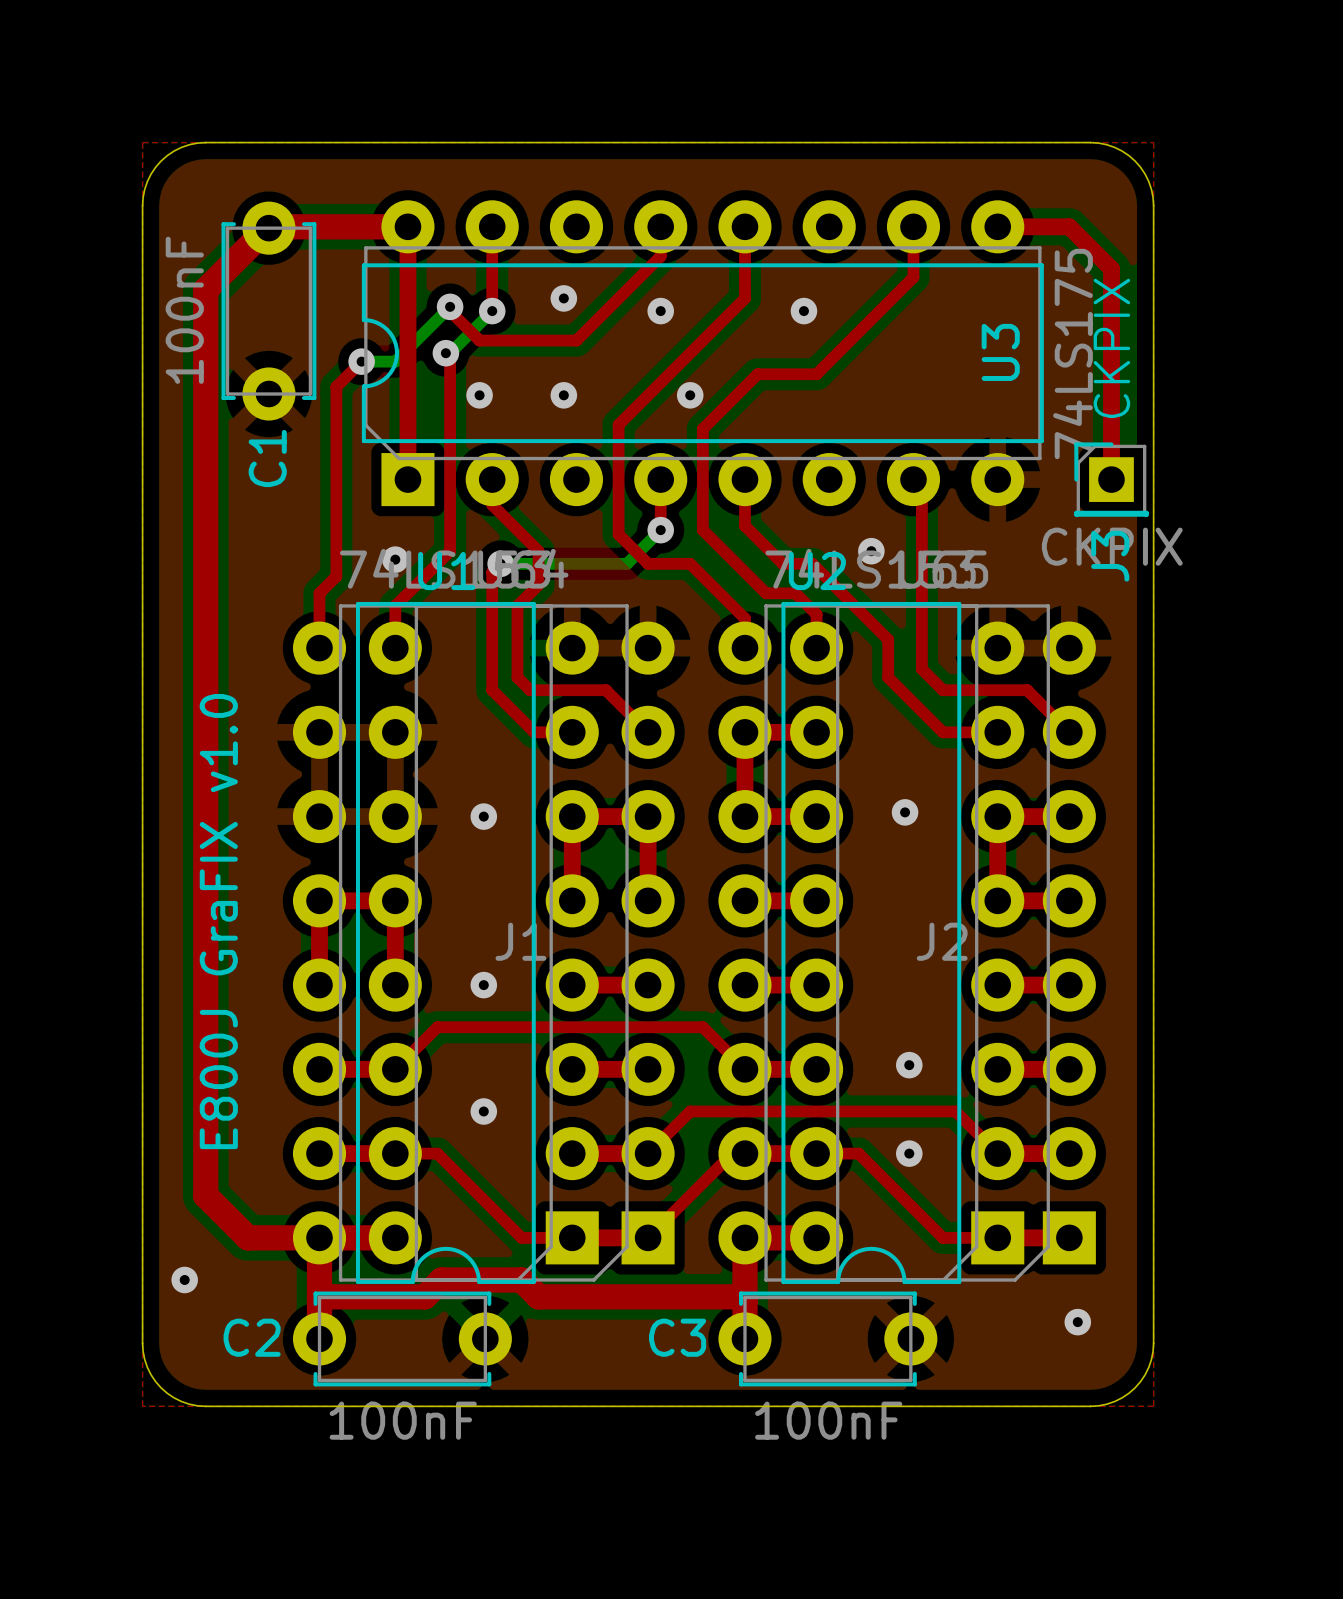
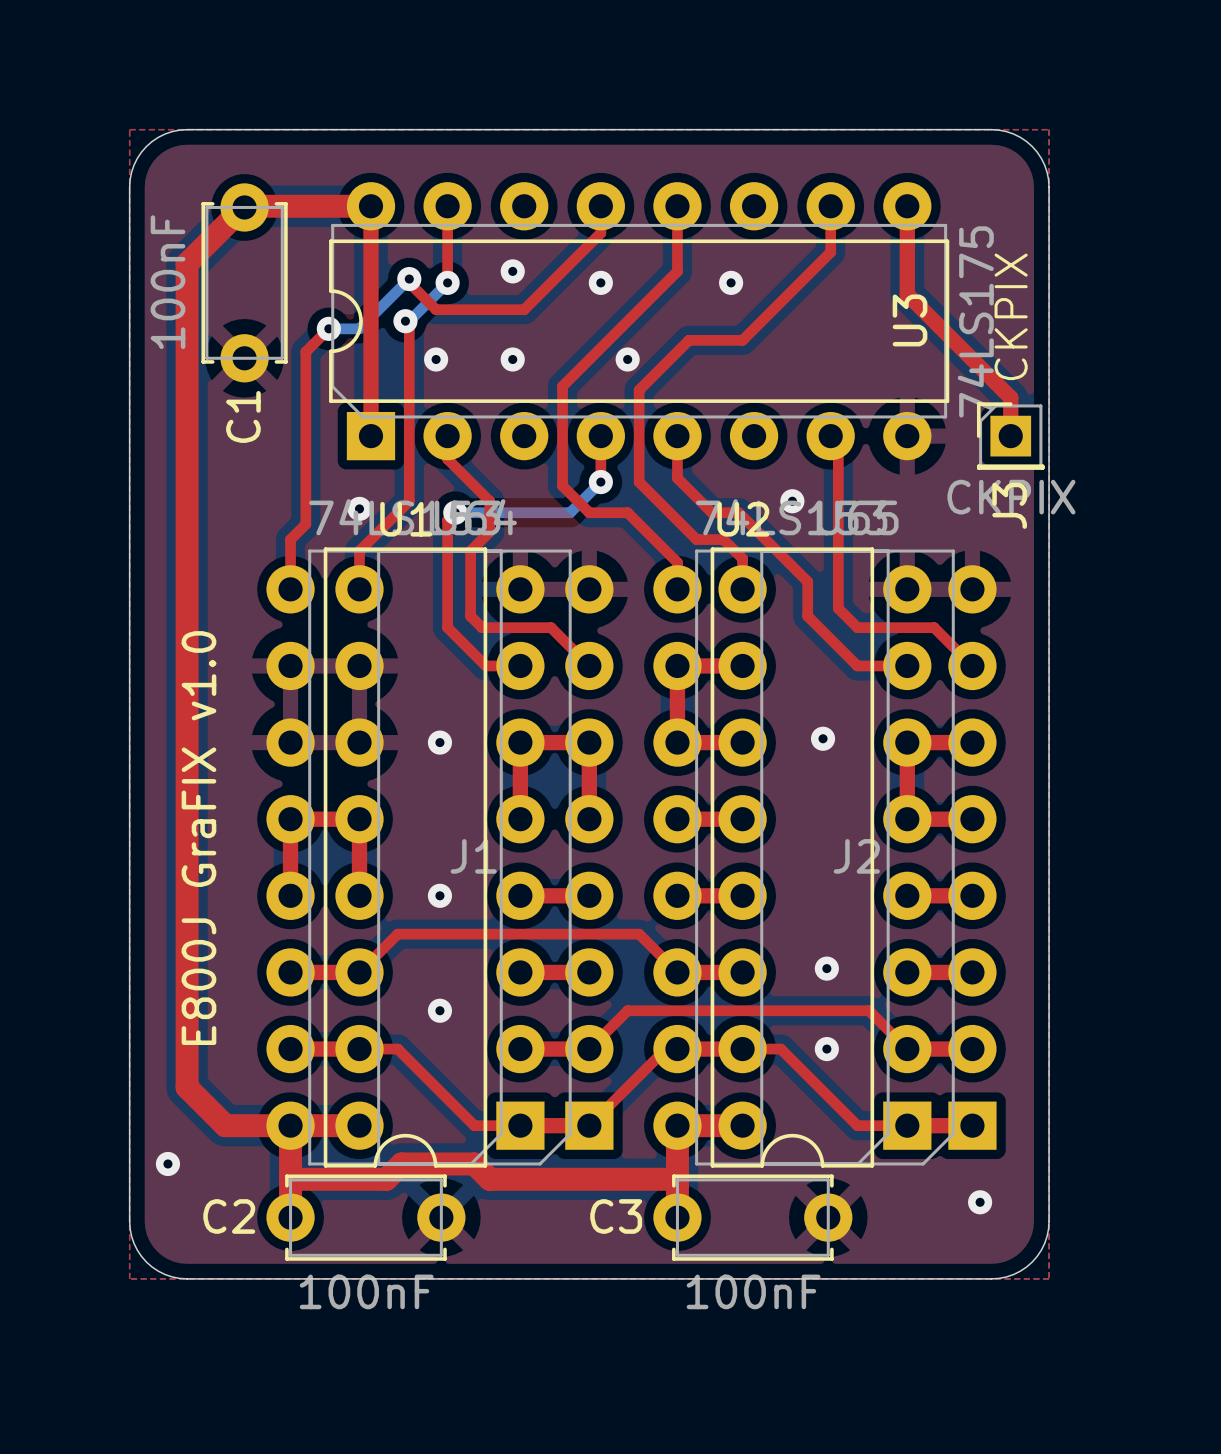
top track: (997, 226) (1069, 226) (1111, 268) (1111, 437) -> (907, 206) (907, 294) (1010, 397)

